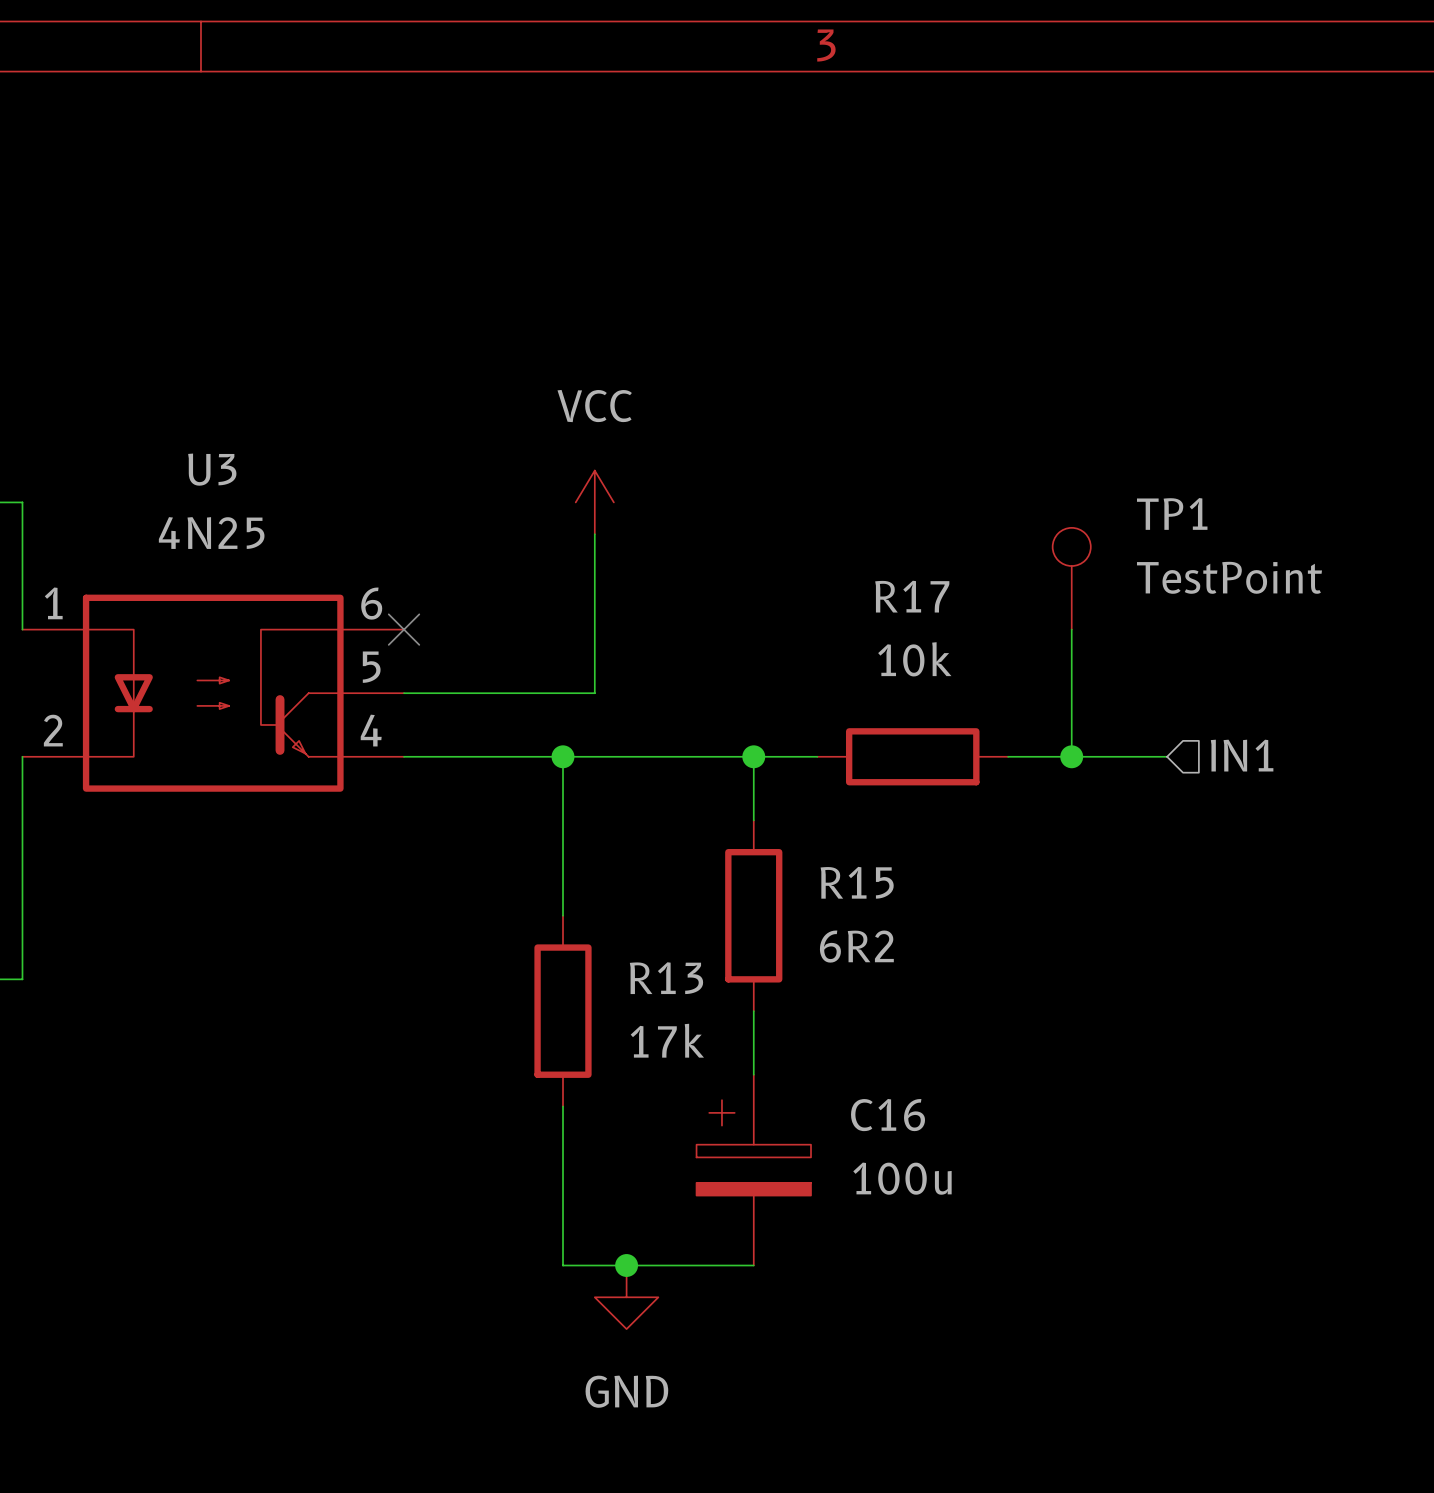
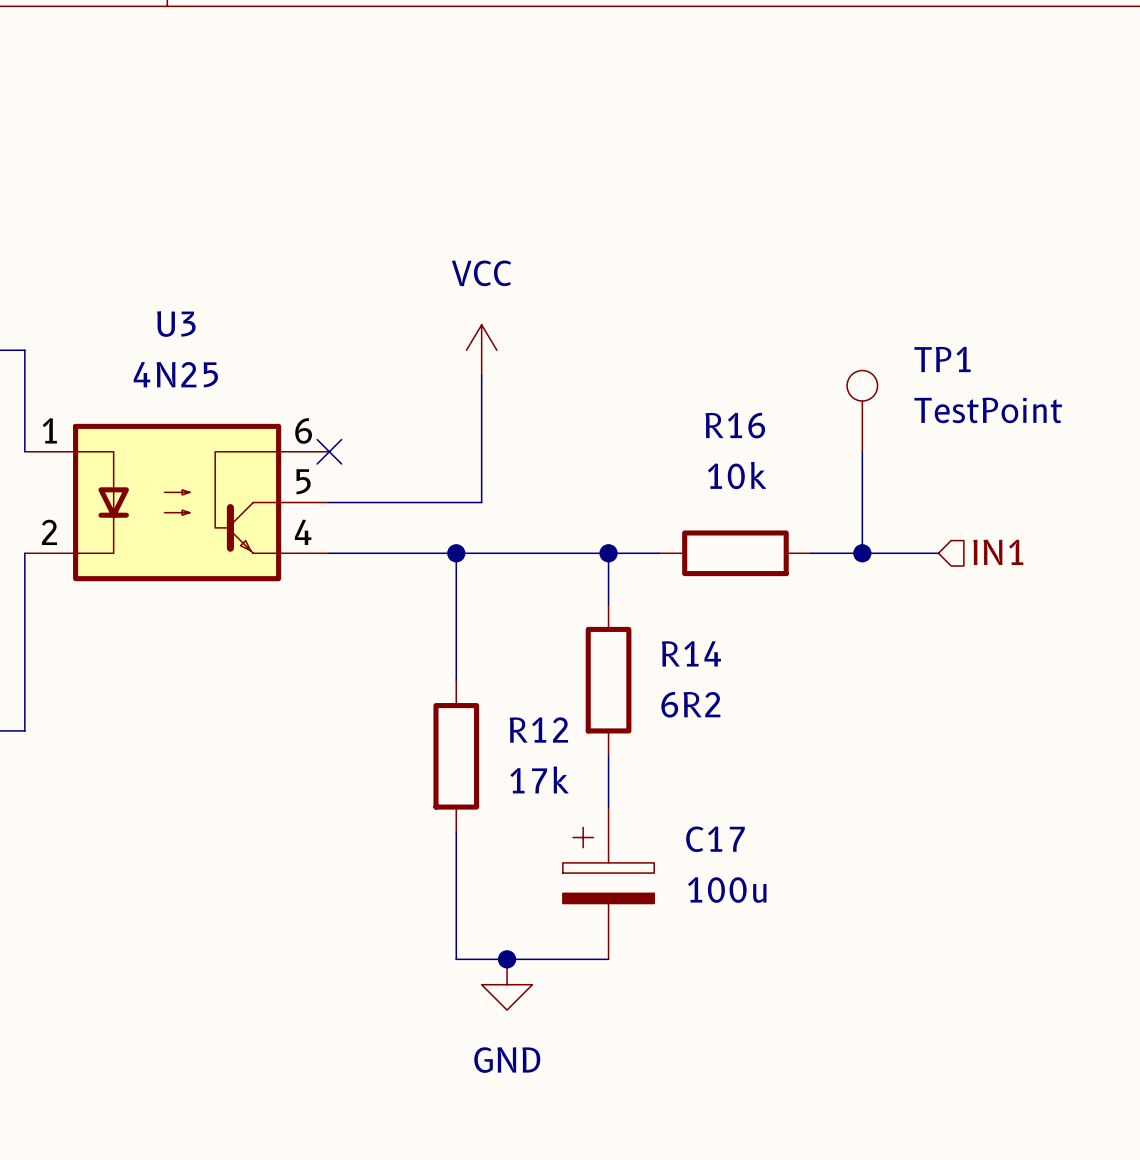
R17 name: R17 (912, 596) -> R16 (735, 425)
R15 name: R15 (857, 882) -> R14 (691, 653)
R13 name: R13 (666, 978) -> R12 (538, 729)
C16 name: C16 (888, 1115) -> C17 (715, 839)

